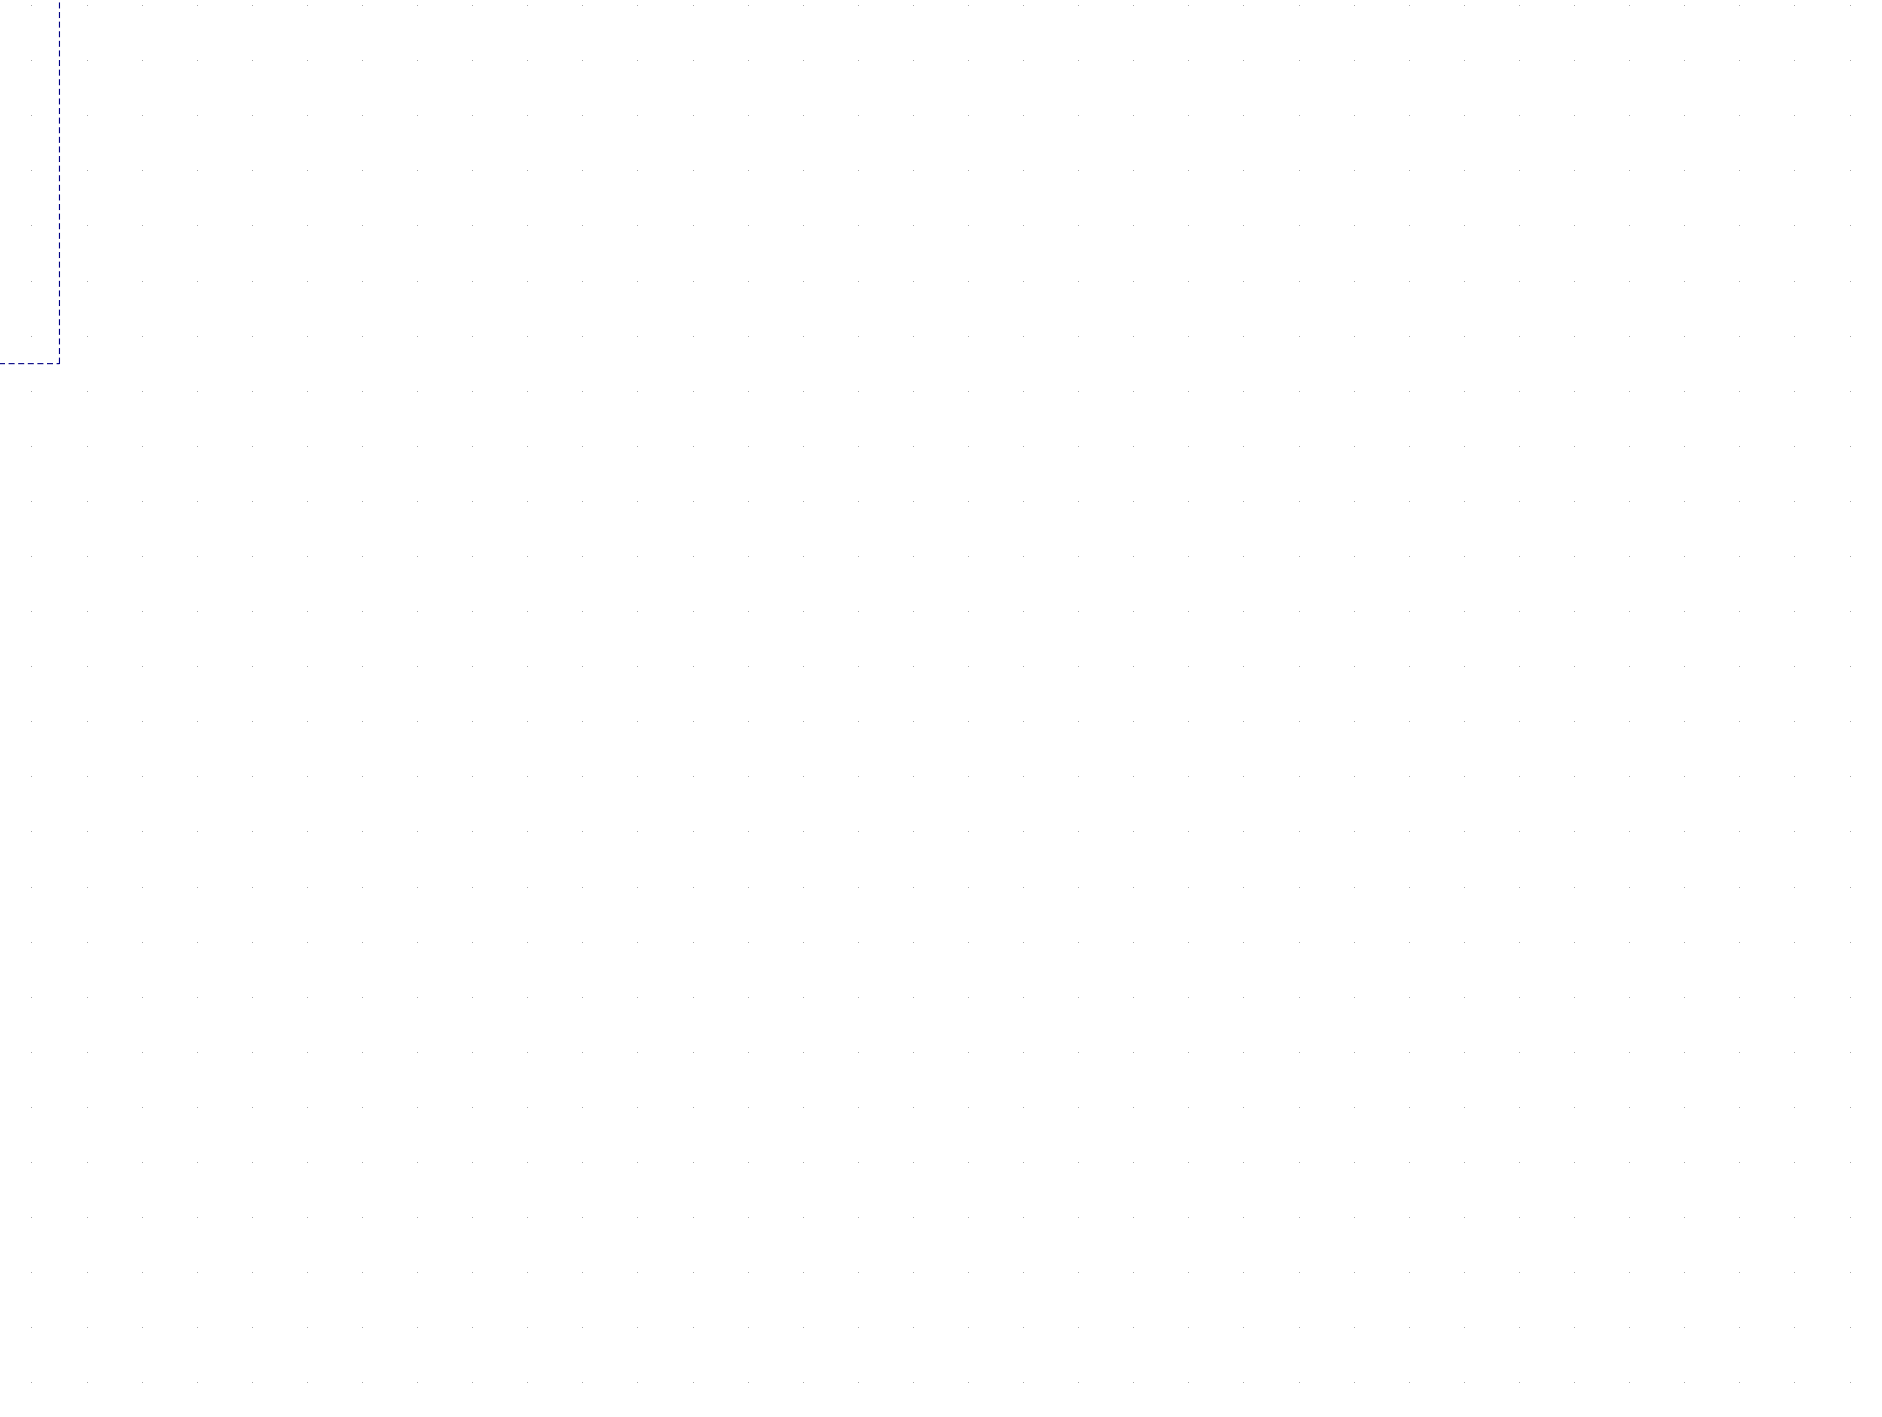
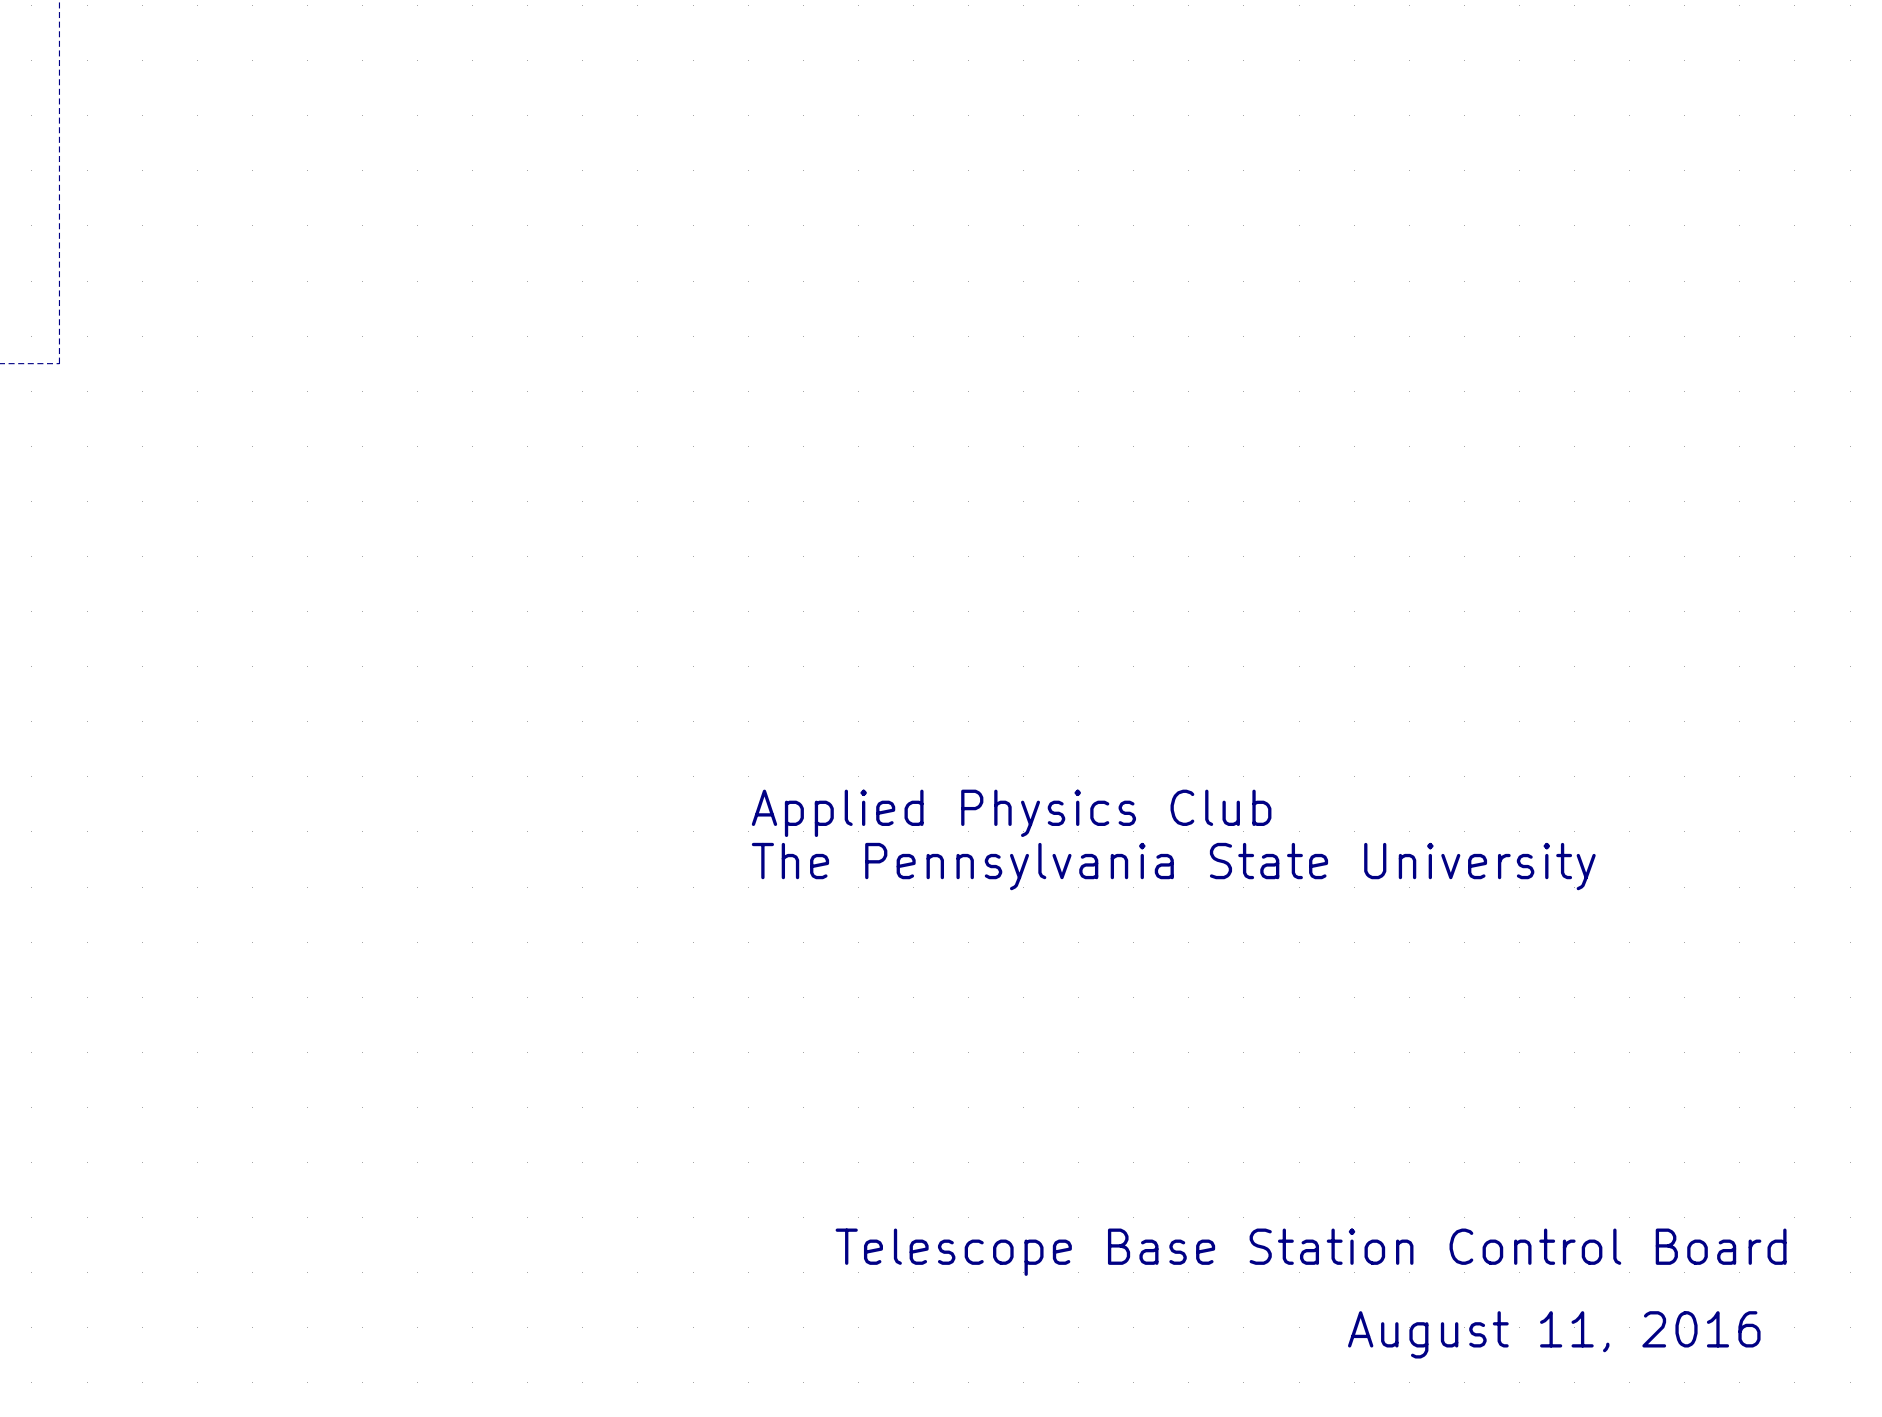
text: none -> Applied Physics Club (1011, 813)
text: none -> The Pennsylvania State University (1173, 866)
text: none -> Telescope Base Station Control Board (1311, 1252)
text: none -> August 11, 2016 (1554, 1334)

